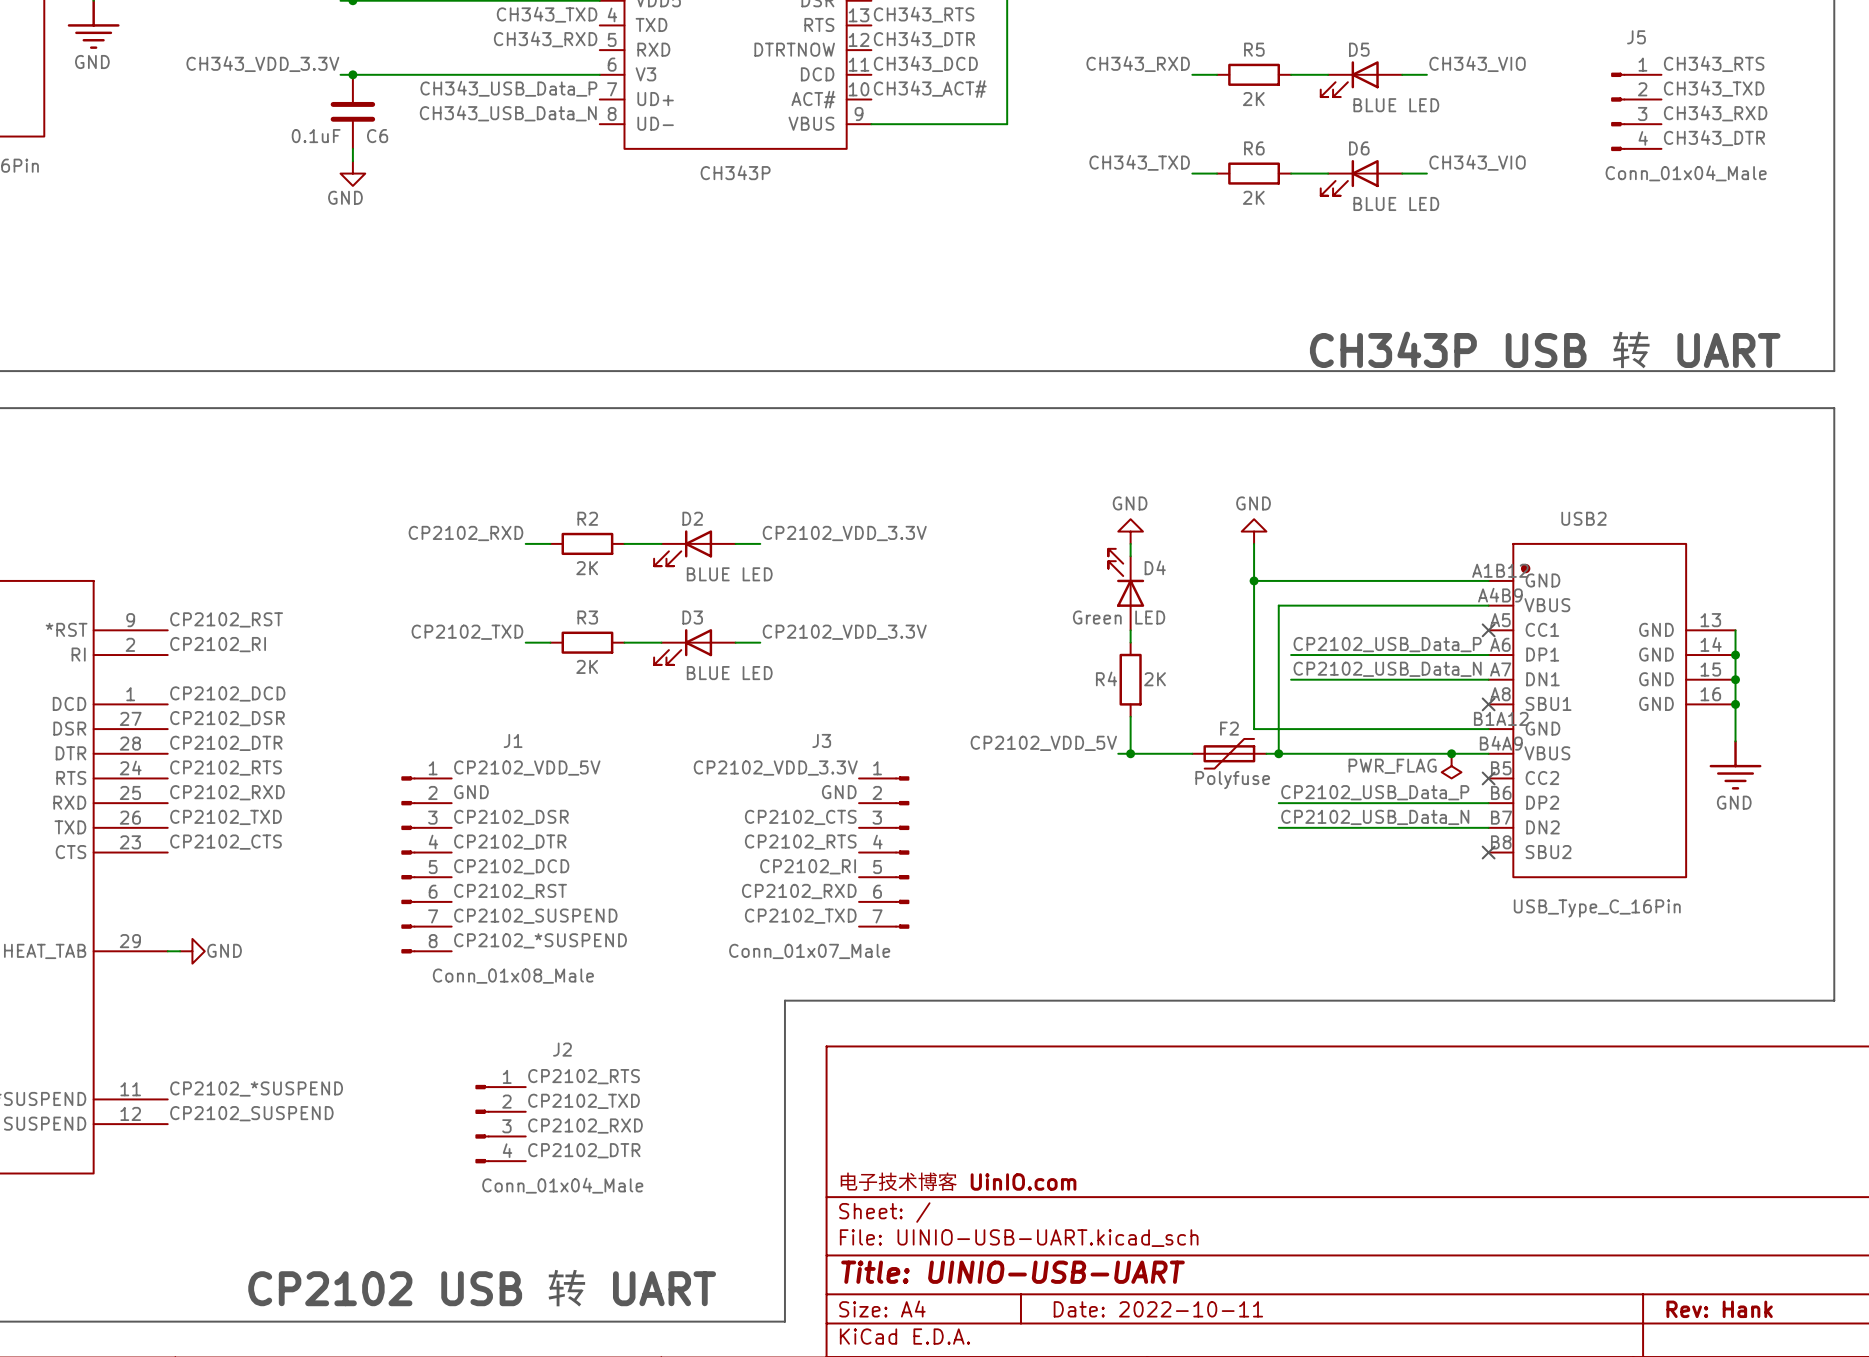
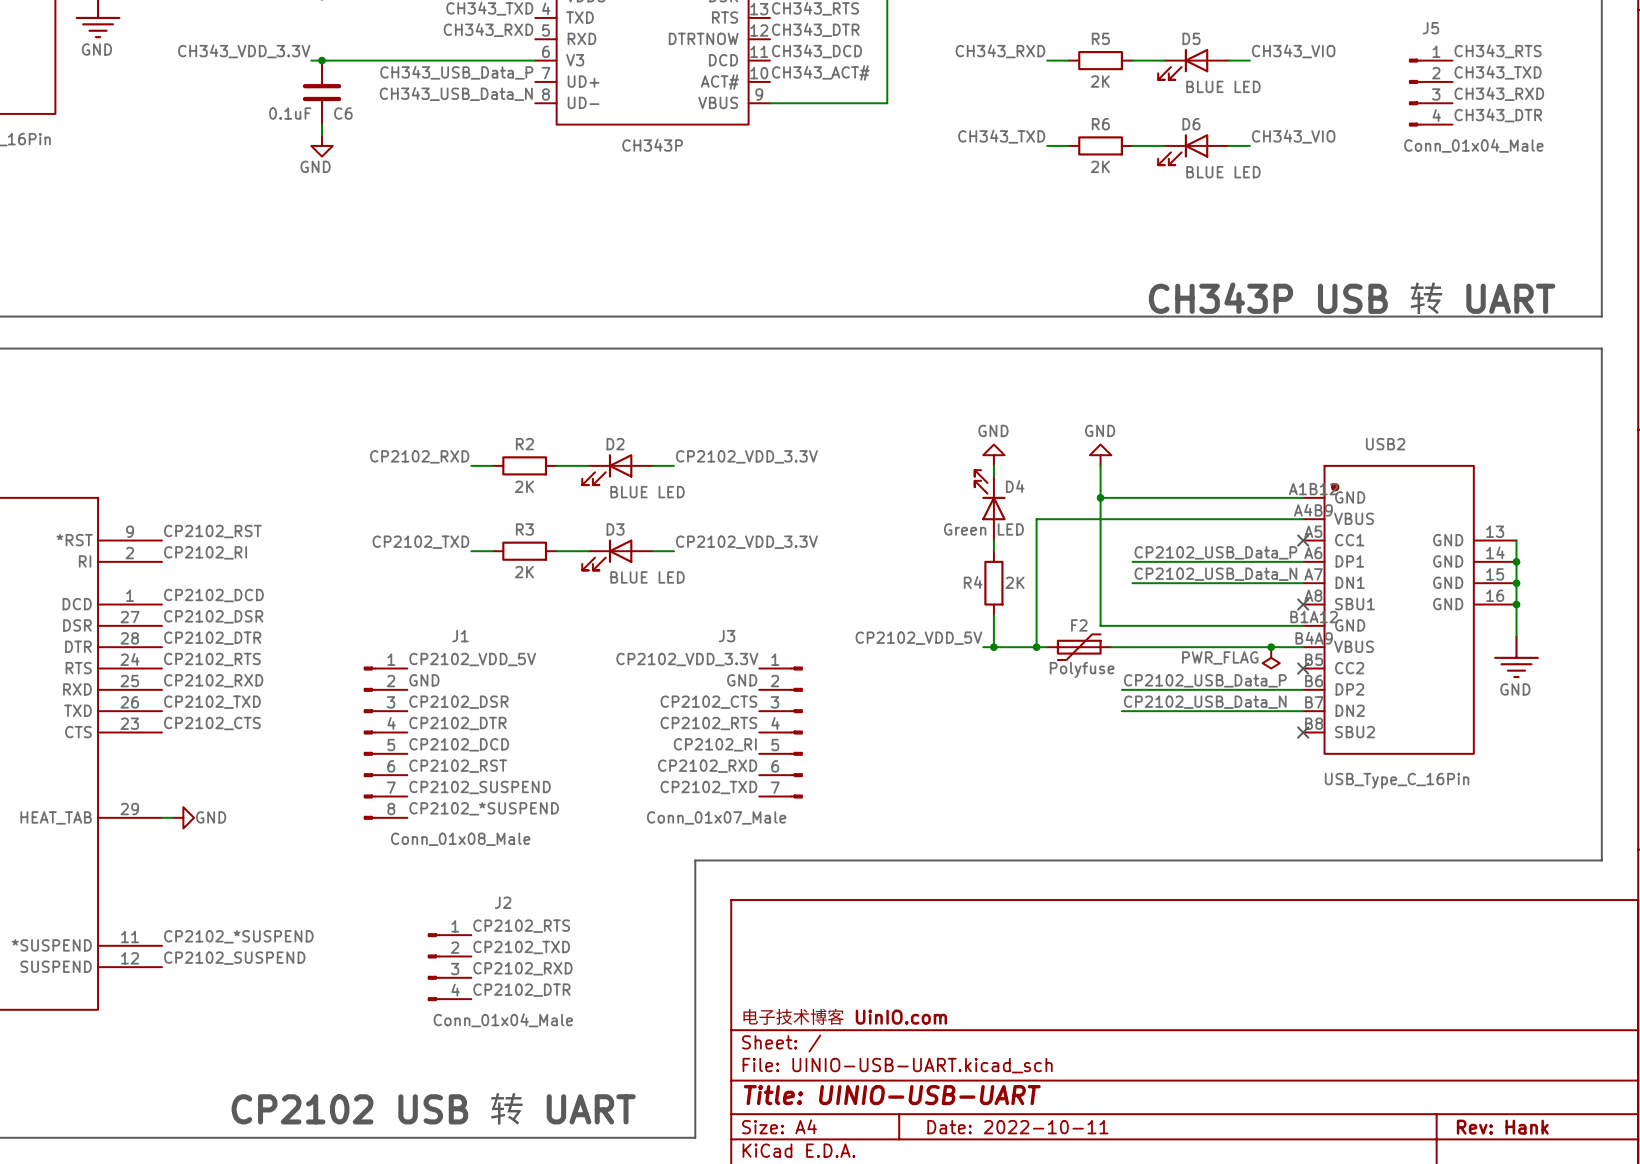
wire: (1278, 605) (1278, 753) -> (1121, 519) (1036, 519) (1036, 647)
junction: none -> (1036, 647)
junction: (1278, 753) -> none

